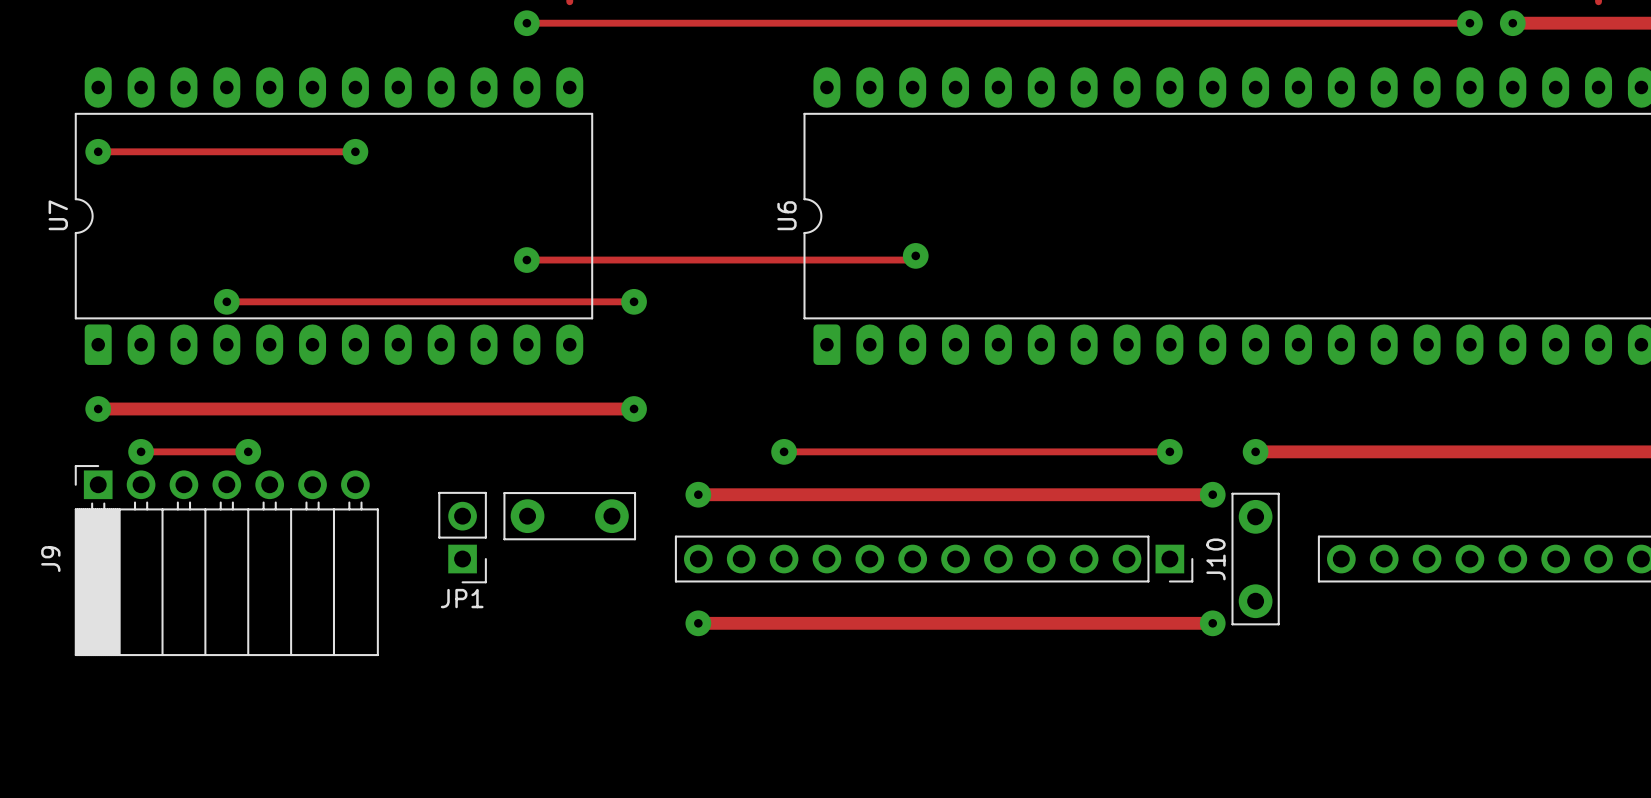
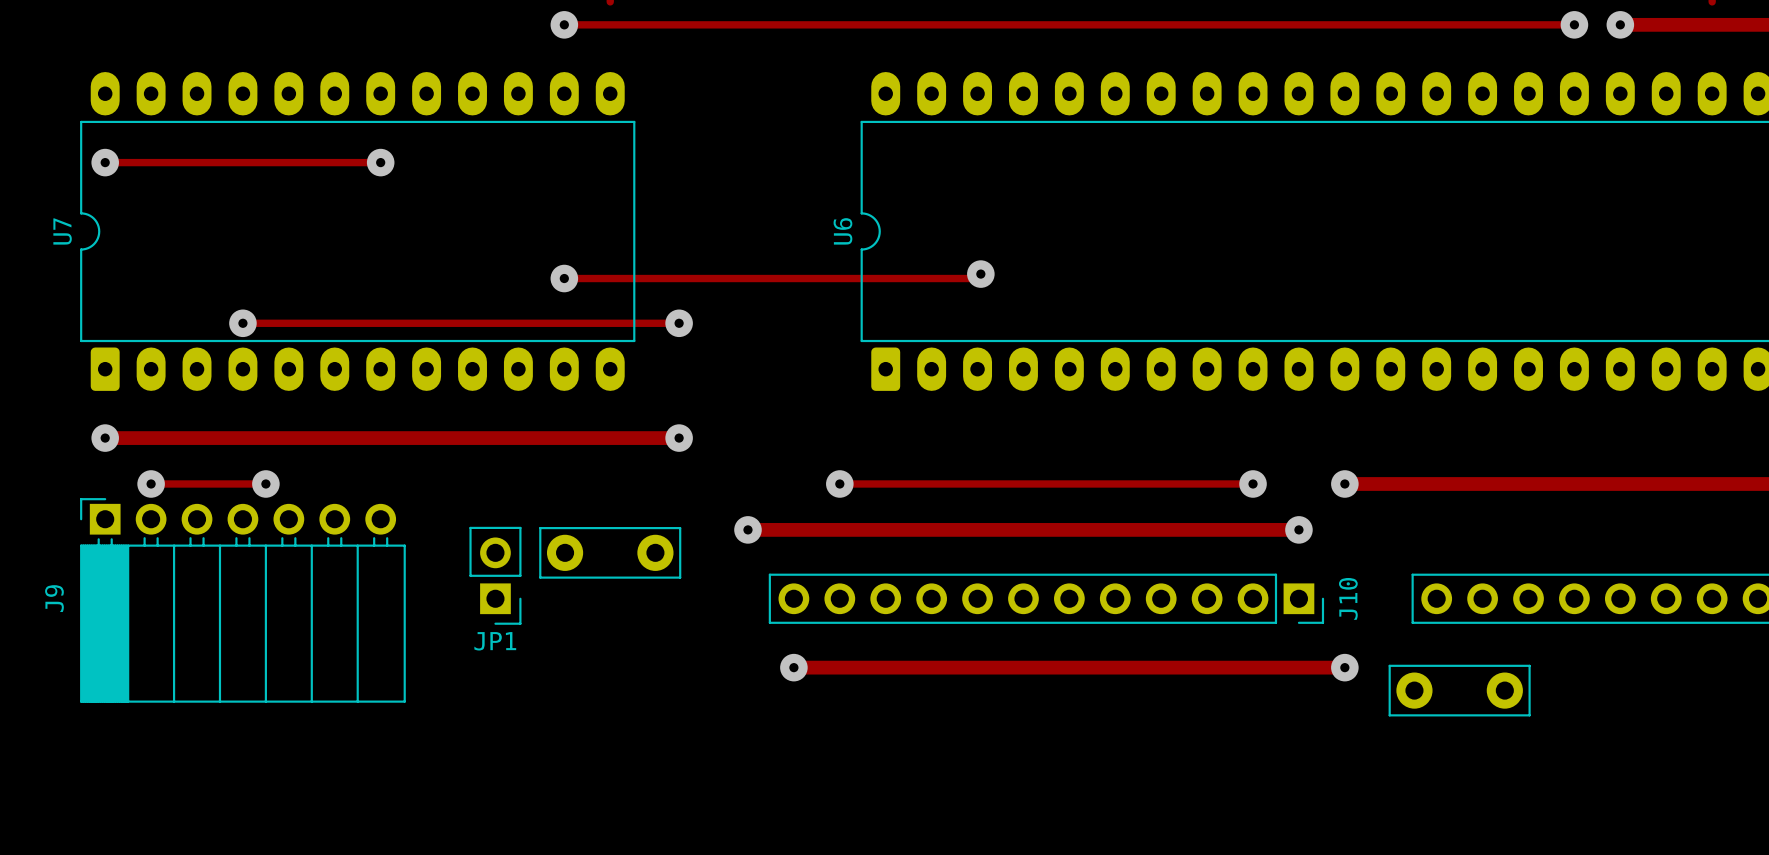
J10 position: (934, 559) -> (1046, 598)
part rotation: 0° (1255, 559) -> 90° clockwise (1459, 690)
part position: (1255, 559) -> (1459, 690)
track: (698, 623) (741, 623) -> none
via position: (698, 623) -> (793, 667)
track: none -> (1298, 667) (1344, 667)
via position: (1212, 623) -> (1344, 667)

